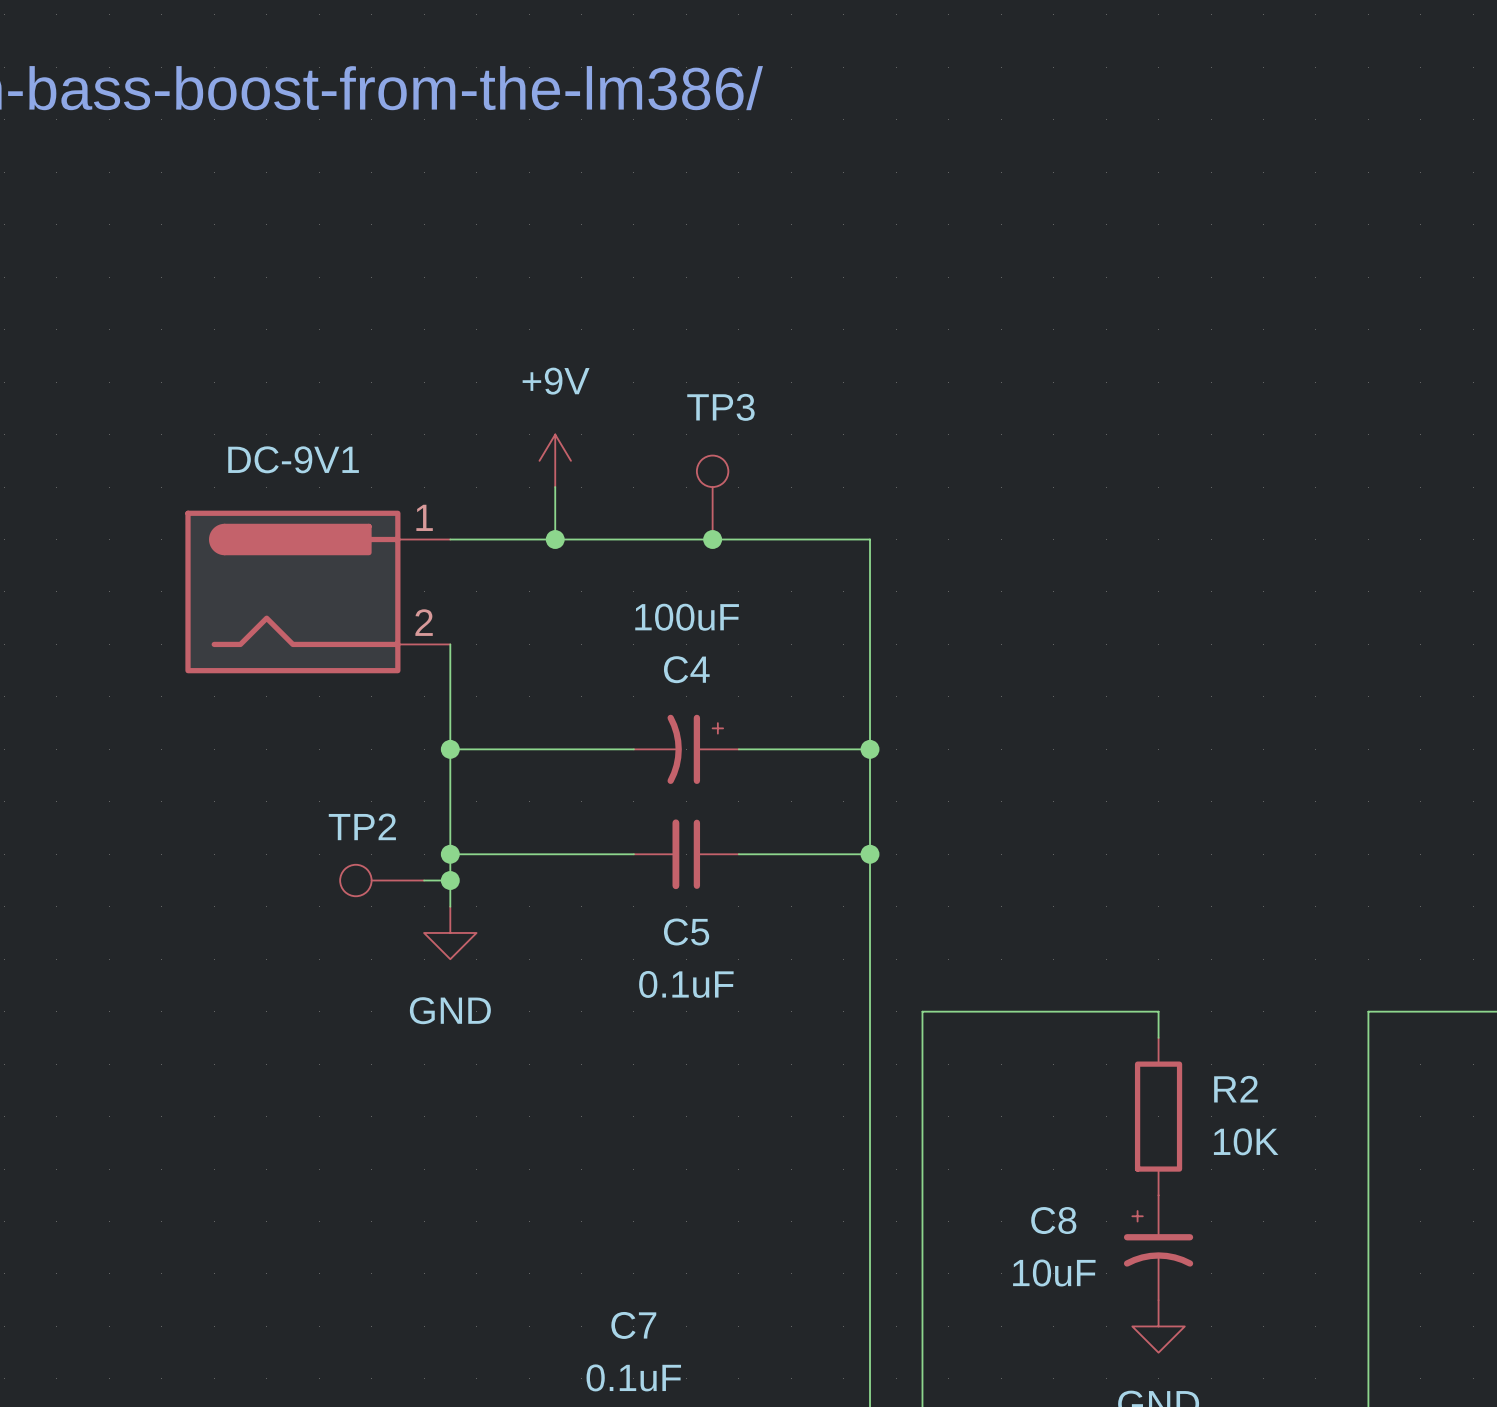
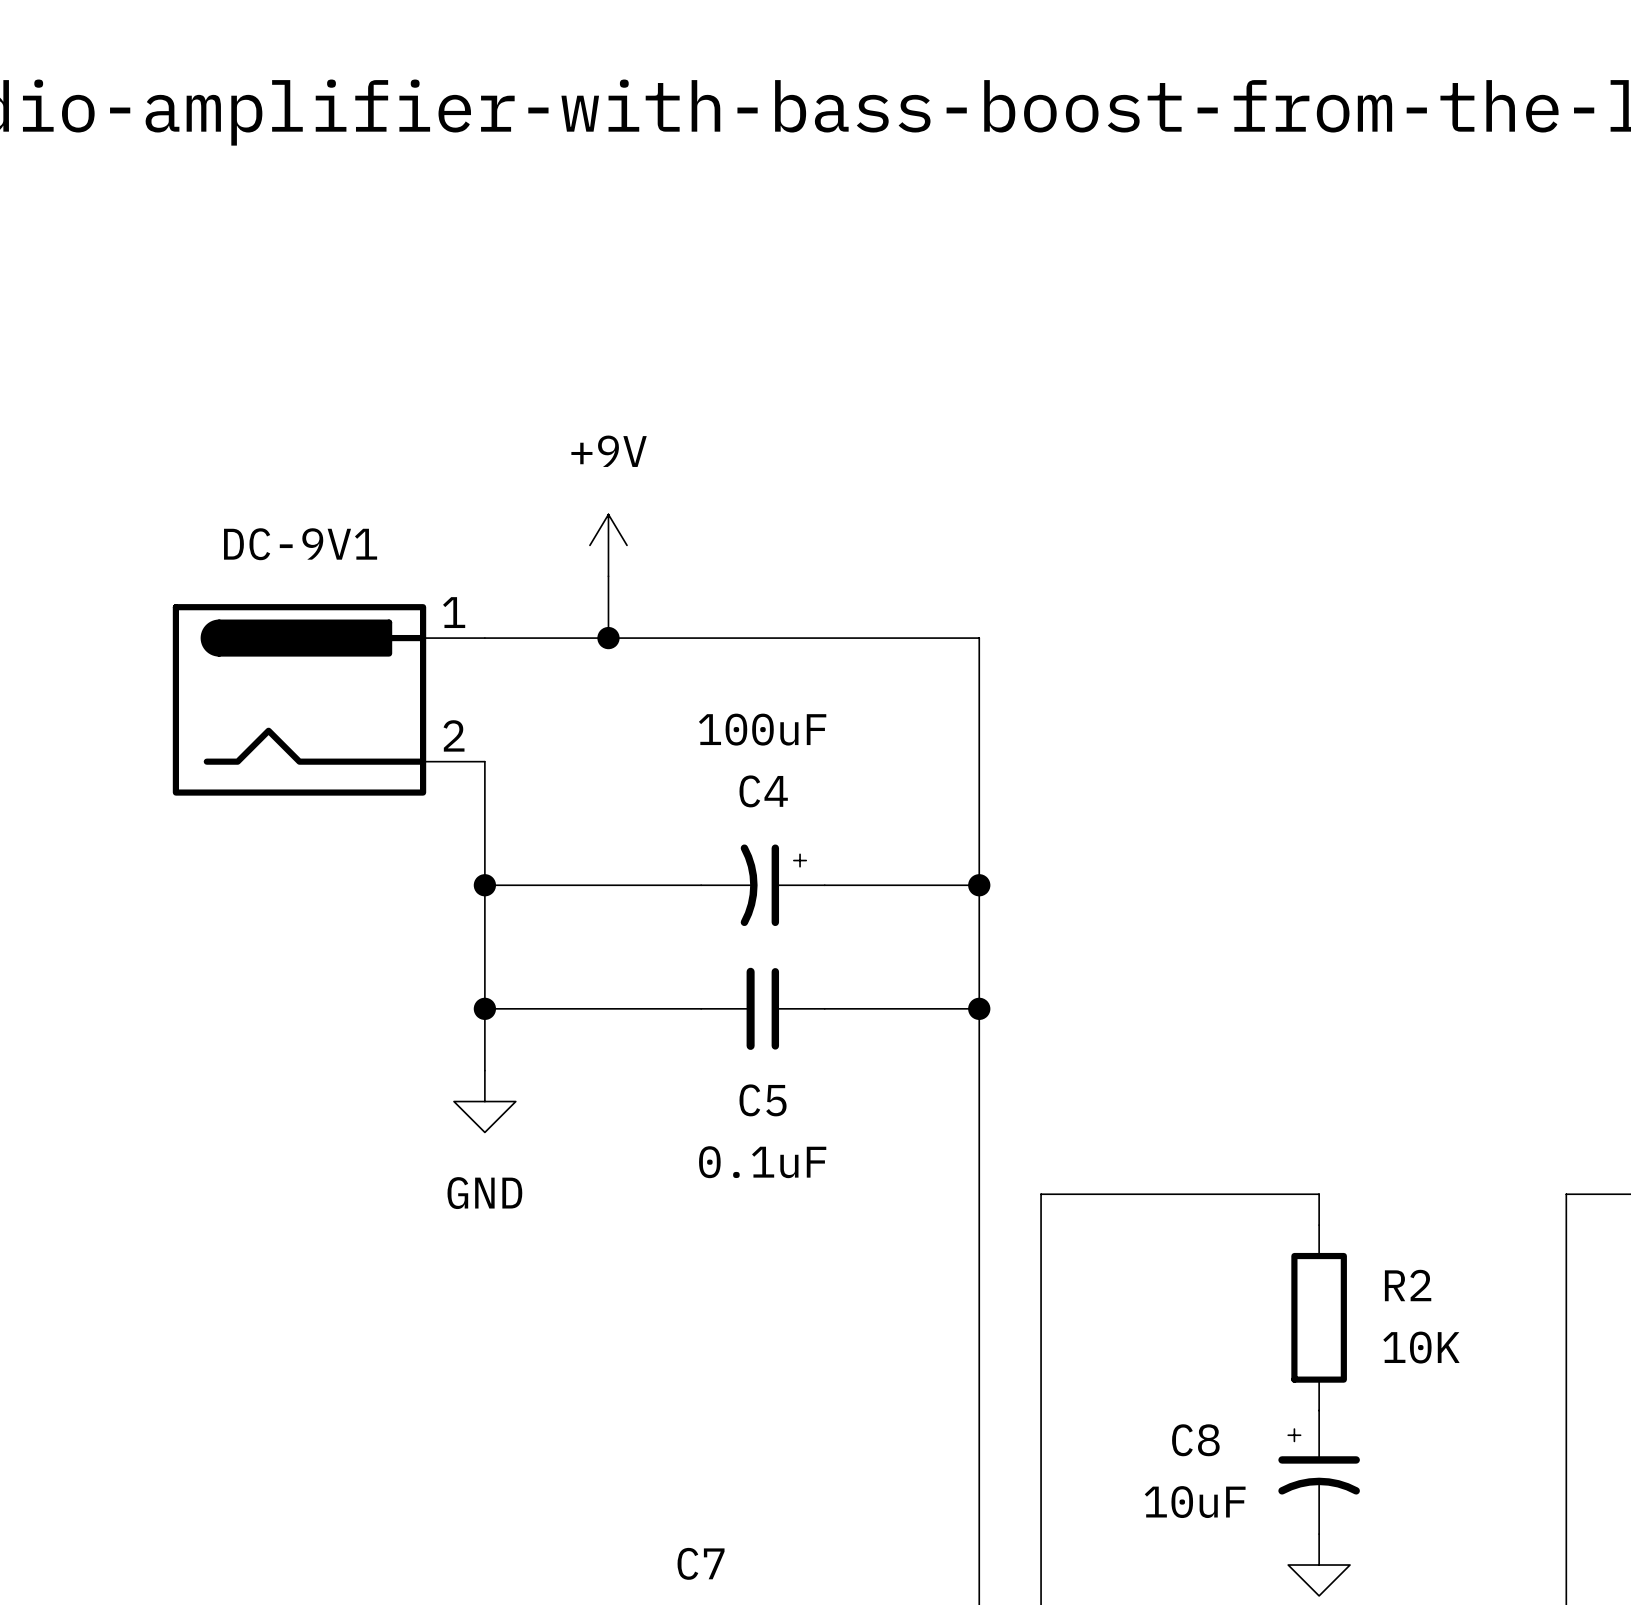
TP3: (712, 497) -> none
junction: (712, 539) -> none
TP2: (382, 880) -> none
wire: (424, 880) (450, 880) -> none
junction: (450, 880) -> none

